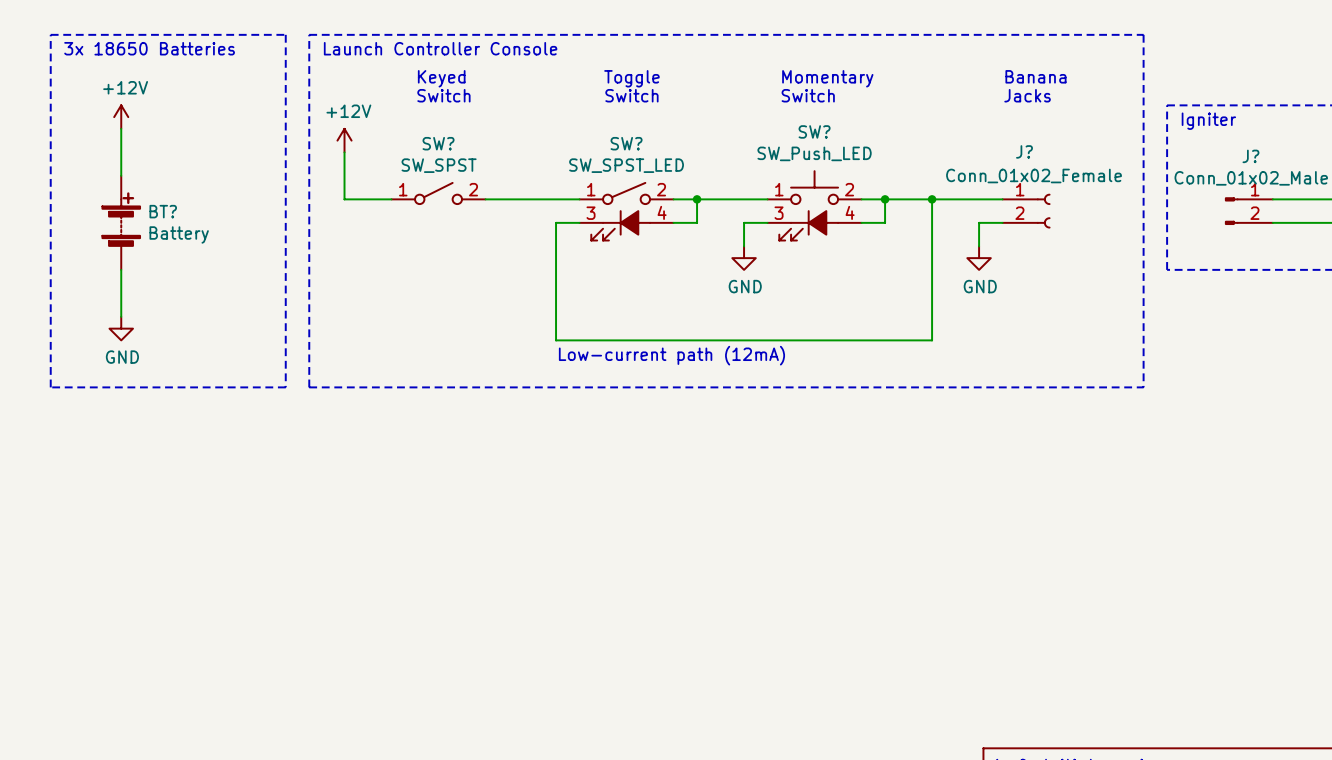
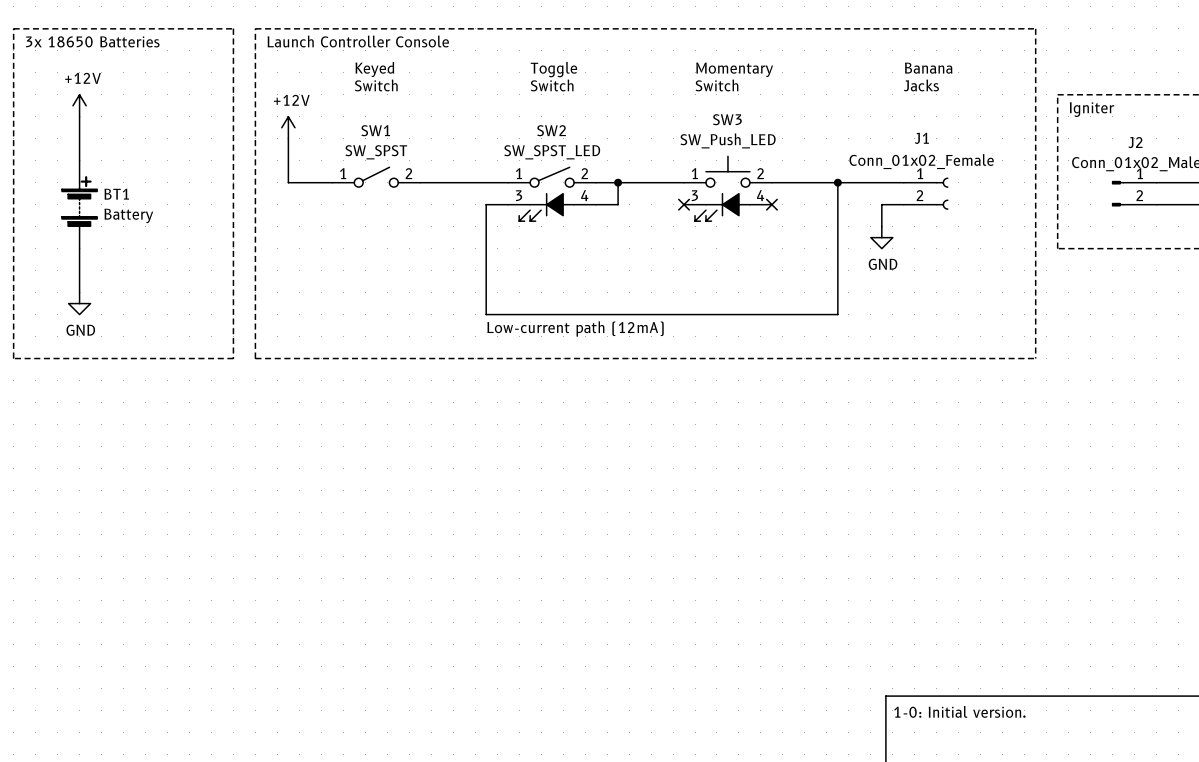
SW? name: SW? (814, 131) -> SW3 (727, 119)
SW? name: SW? (438, 143) -> SW1 (375, 130)
SW? name: SW? (626, 143) -> SW2 (551, 130)
J? name: J? (1024, 151) -> J1 (921, 138)
J? name: J? (1250, 156) -> J2 (1135, 142)
wire: (885, 199) (885, 222) (861, 222) -> none
junction: (885, 199) -> none
BT? name: BT? (163, 211) -> BT1 (116, 194)
wire: (767, 222) (744, 222) (744, 246) -> none
no-connect mark: none -> (684, 204)
no-connect mark: none -> (771, 204)
power symbol: GND (744, 258) -> none

